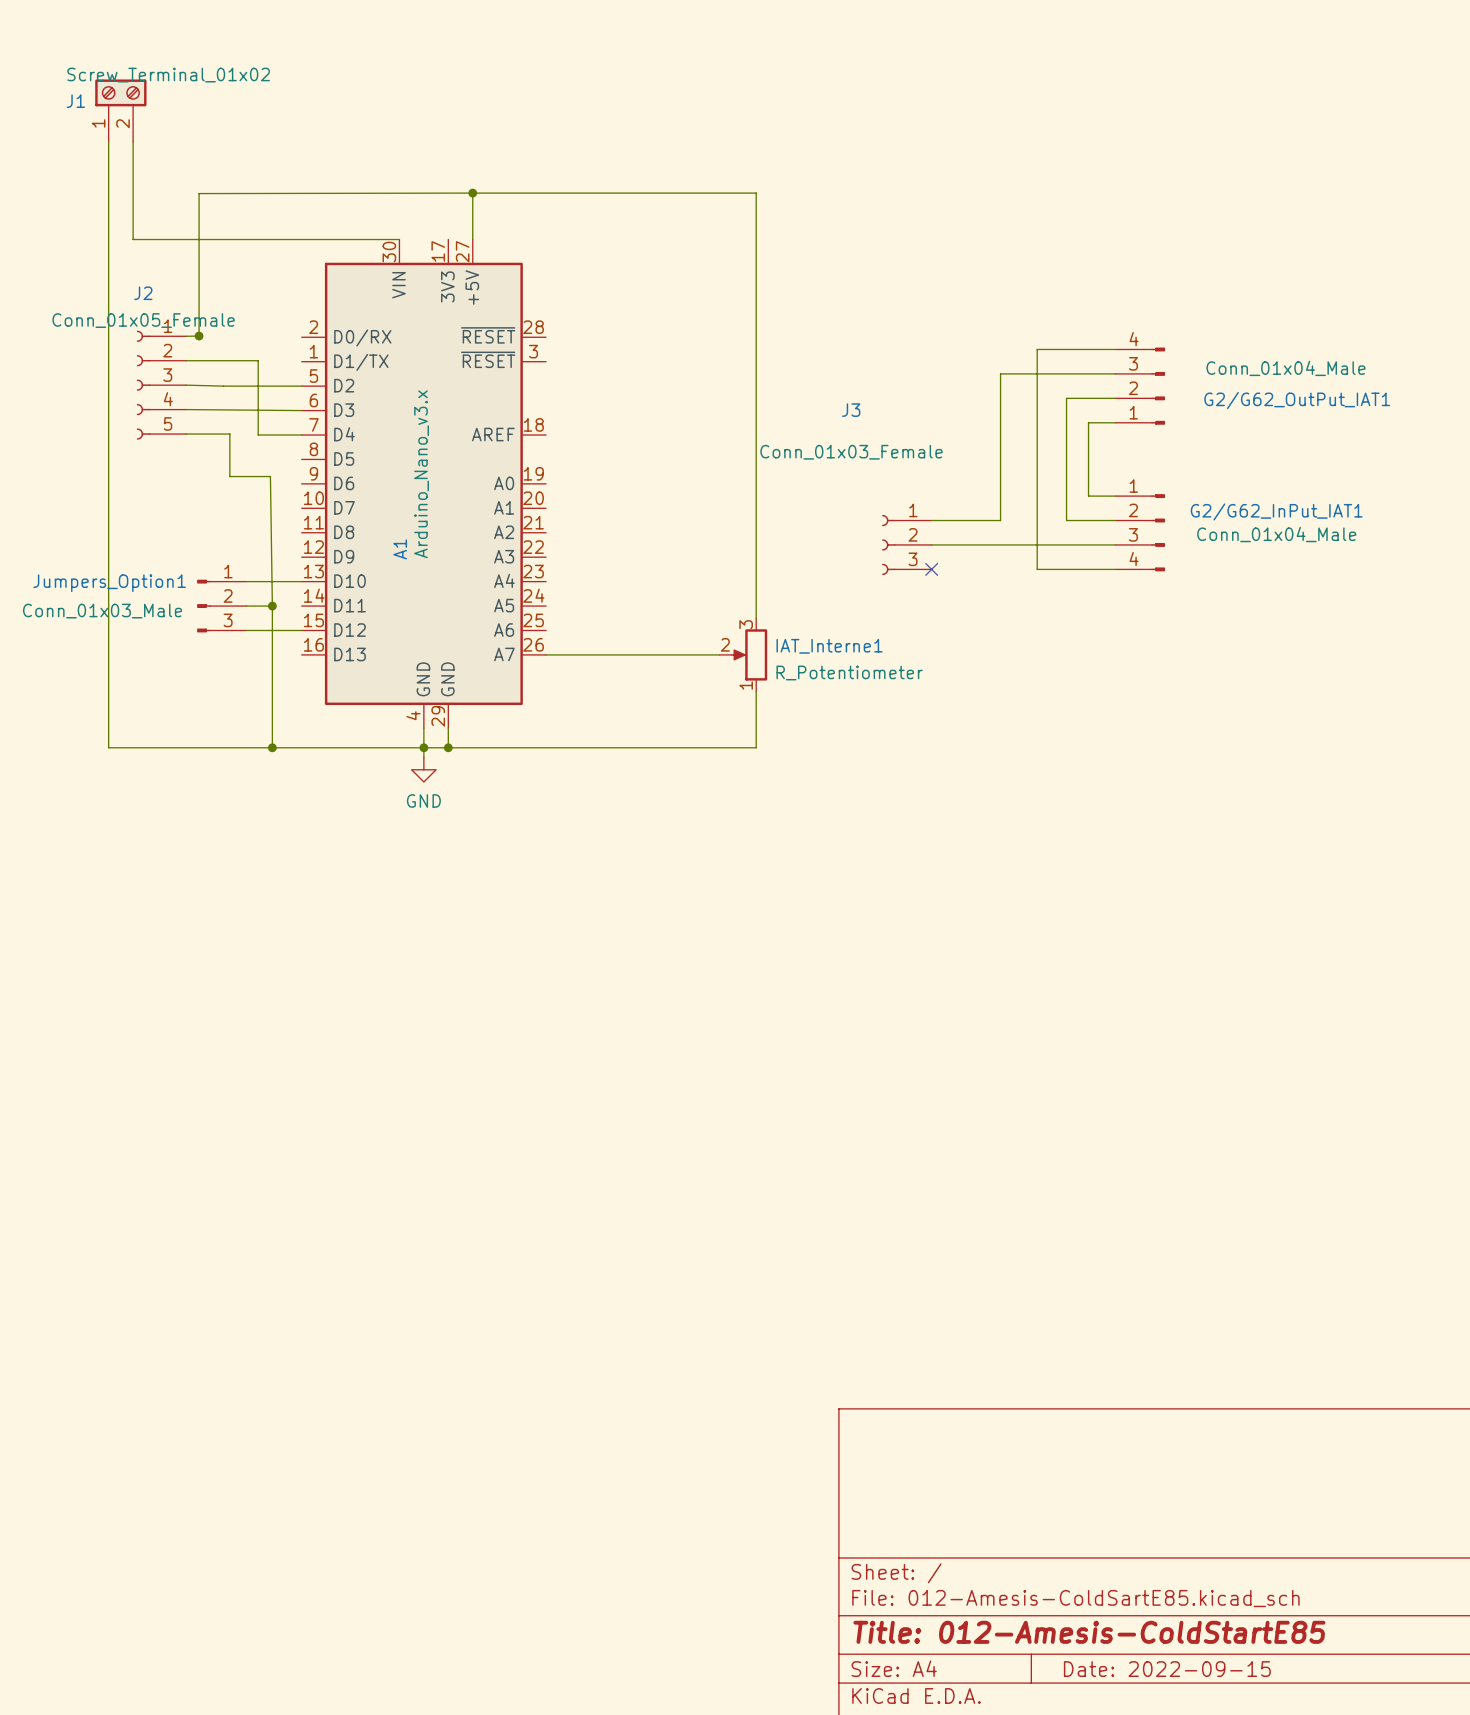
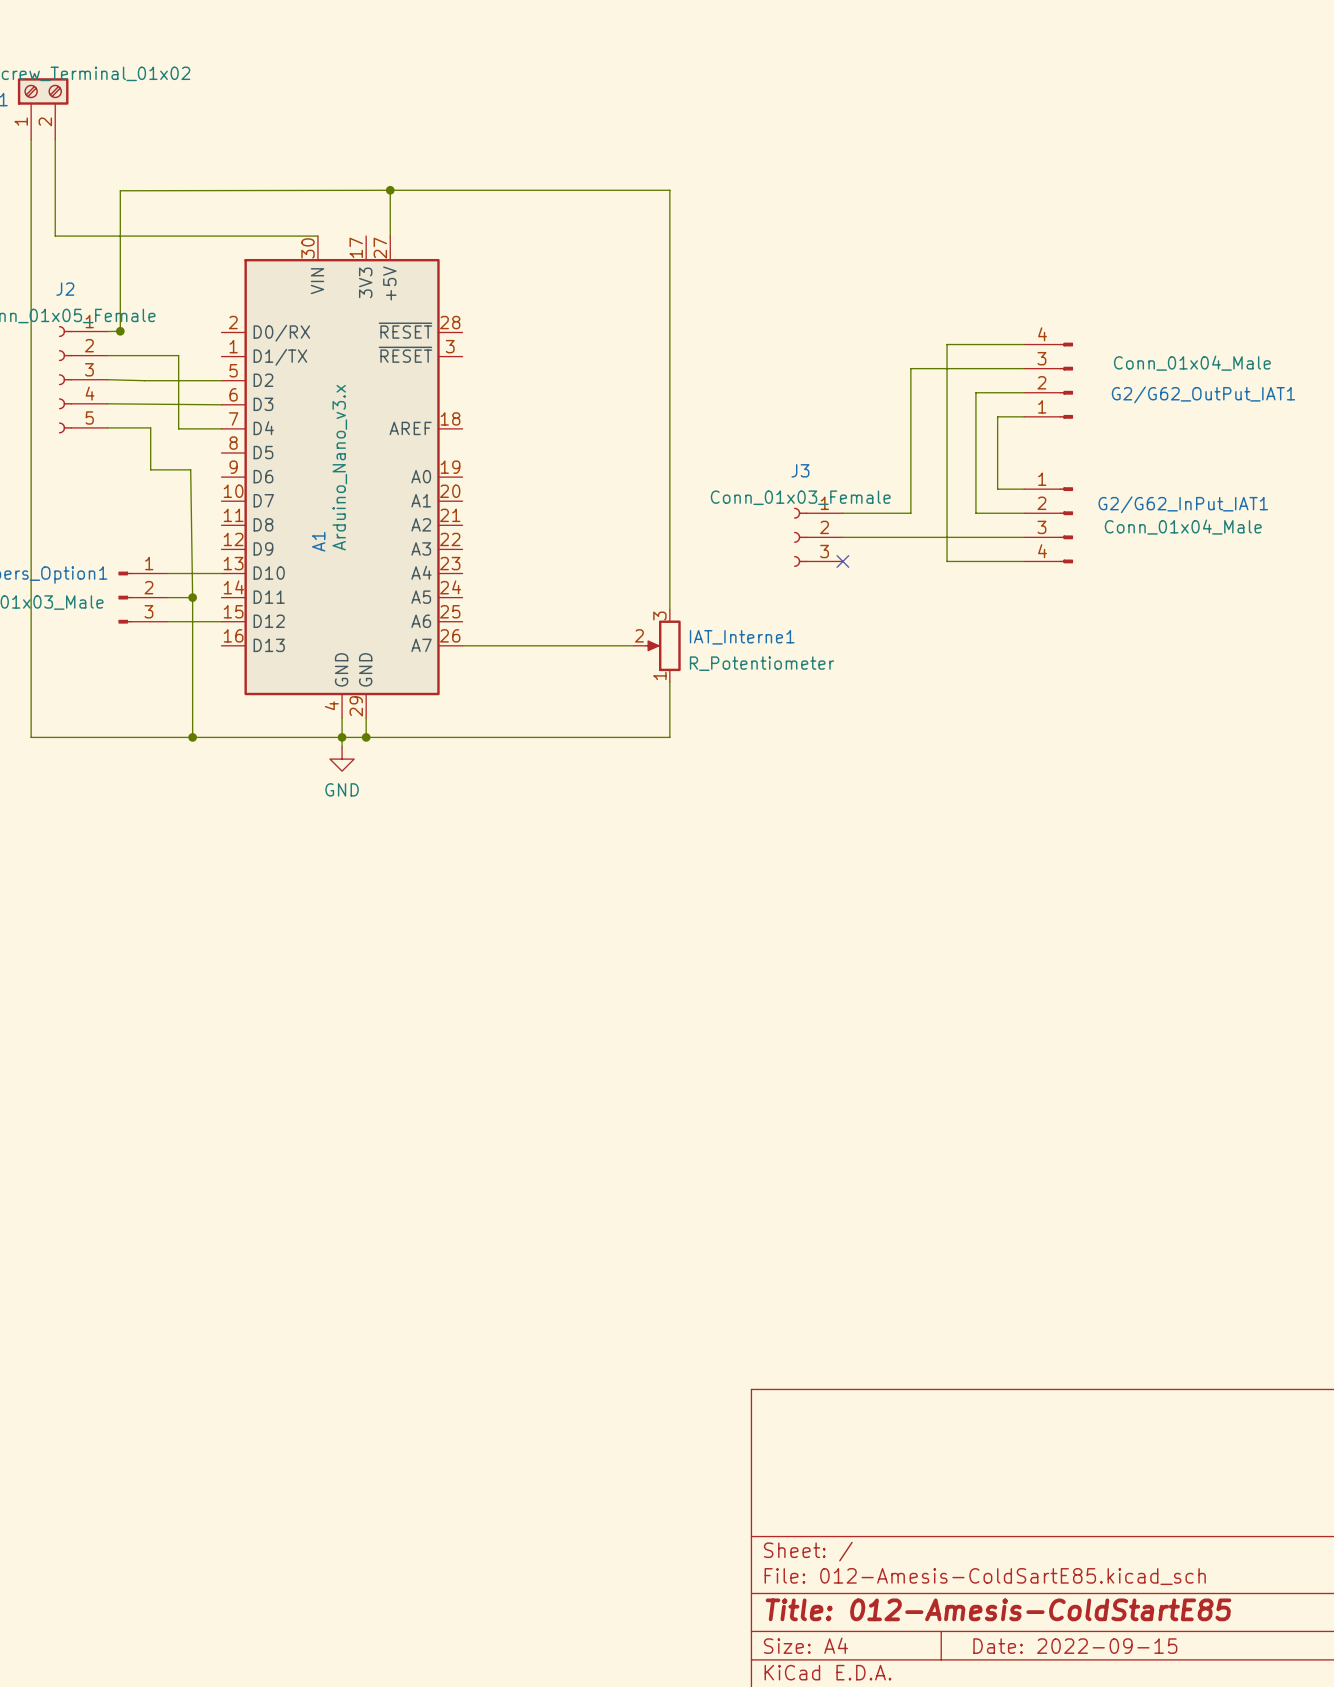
J3 name position: J3 (851, 410) -> J3 (800, 470)
J3 value position: Conn_01x03_Female (851, 452) -> Conn_01x03_Female (800, 497)

